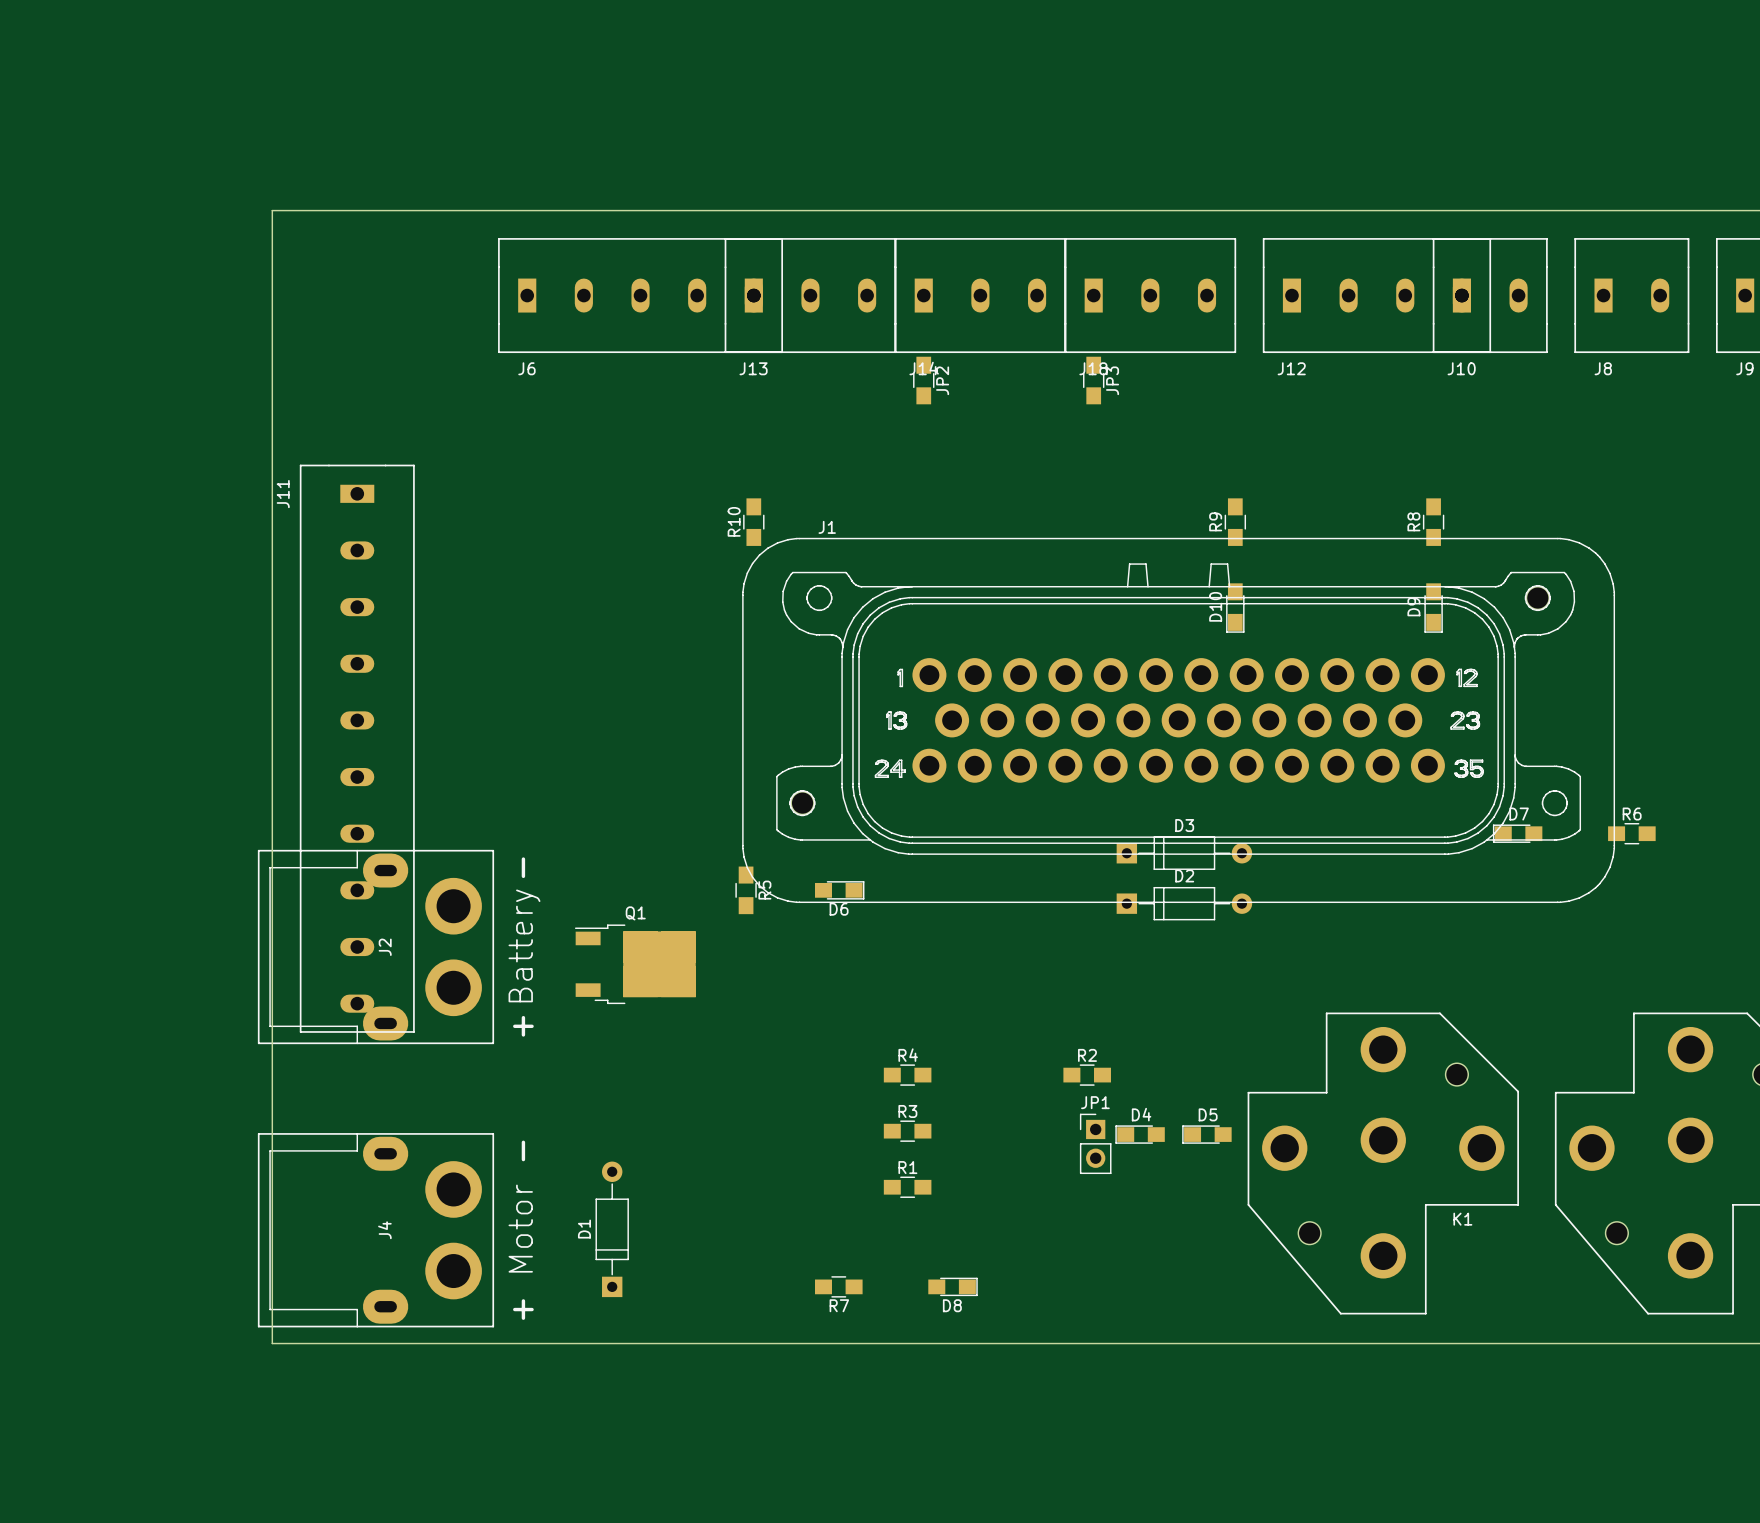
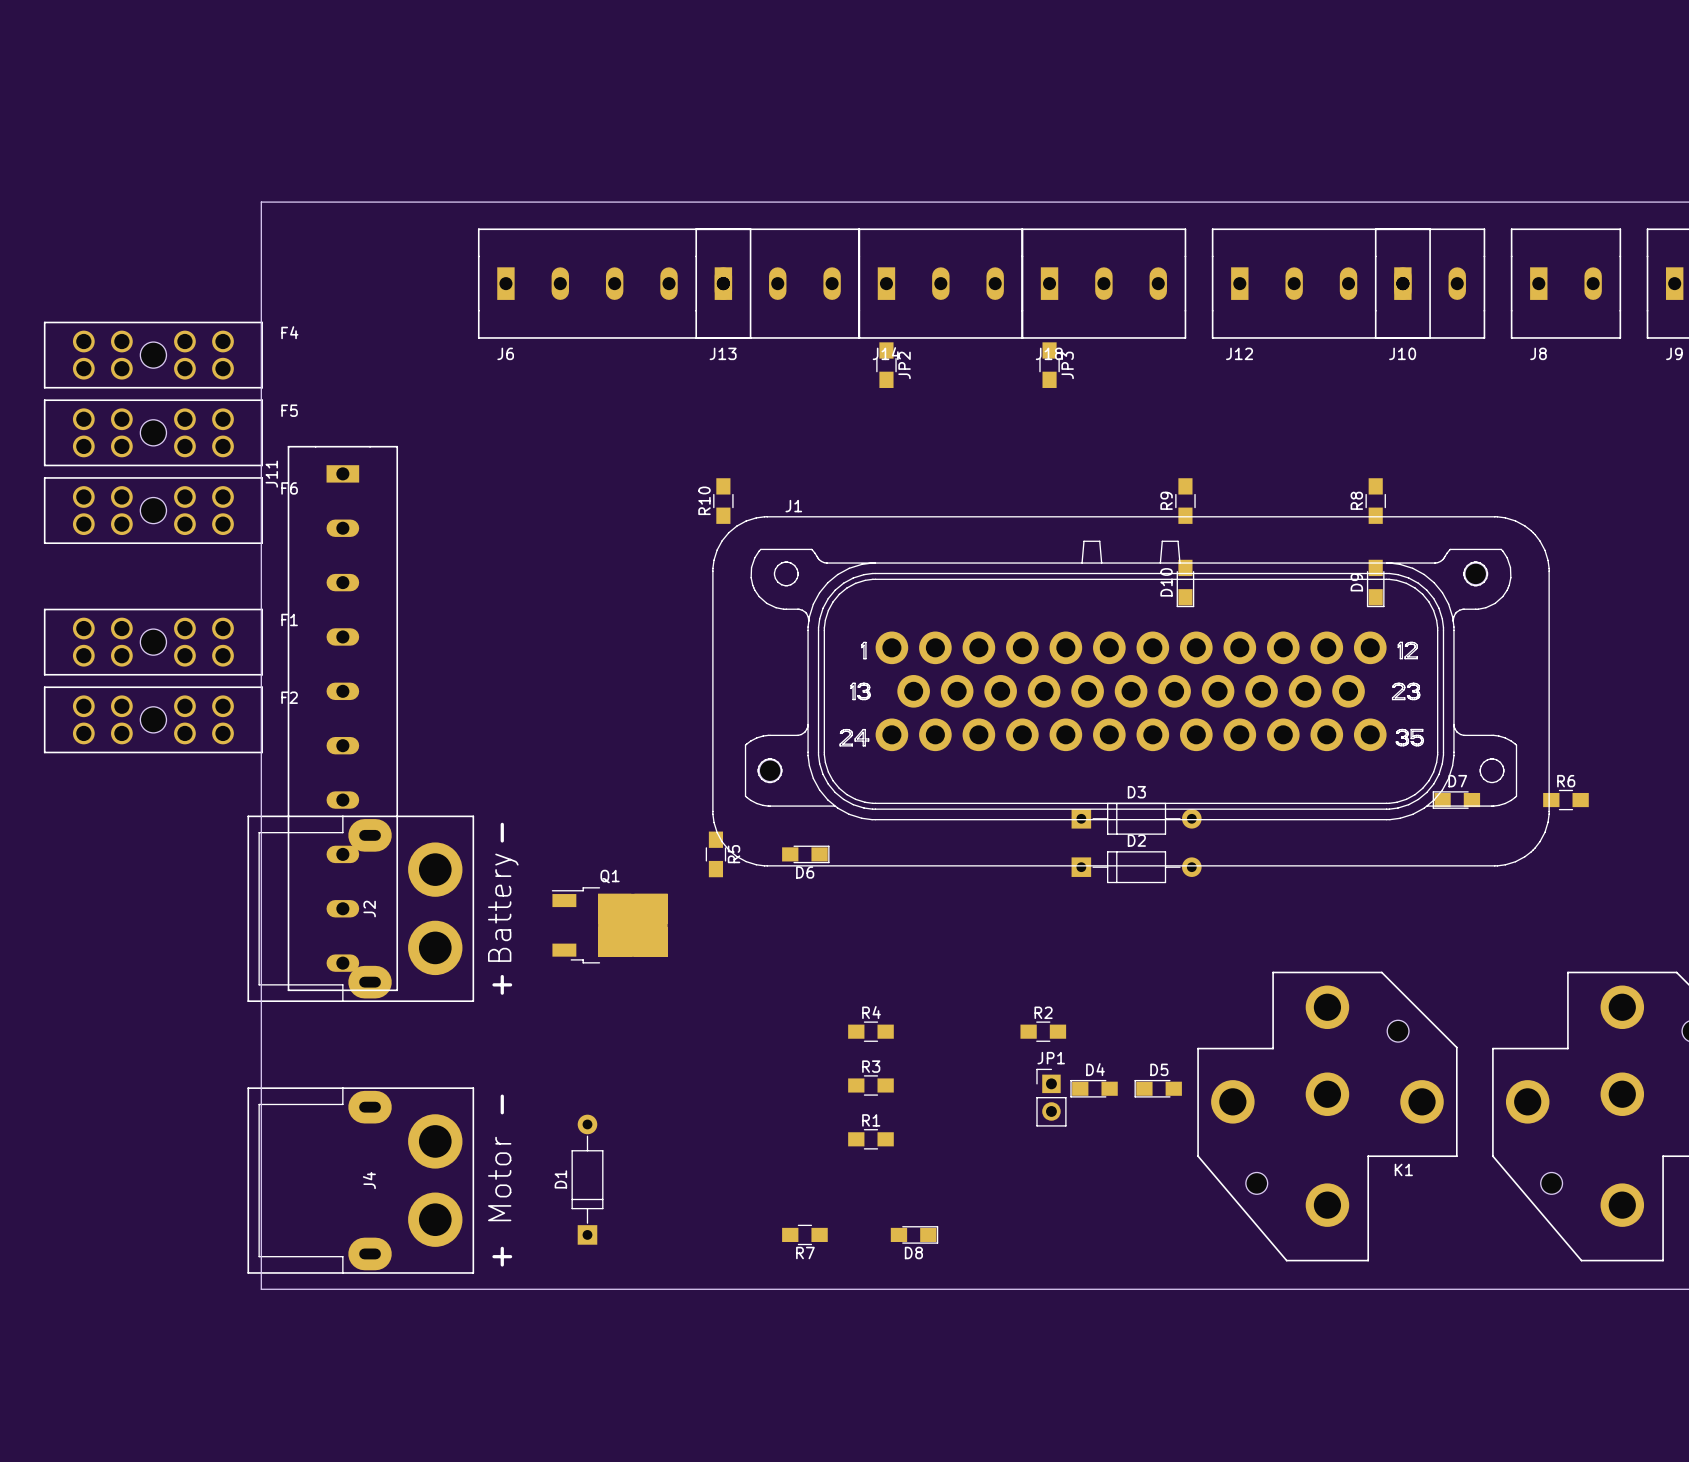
F4: none -> (153, 355)
F5: none -> (153, 432)
F6: none -> (153, 510)
F1: none -> (153, 642)
F2: none -> (153, 719)

